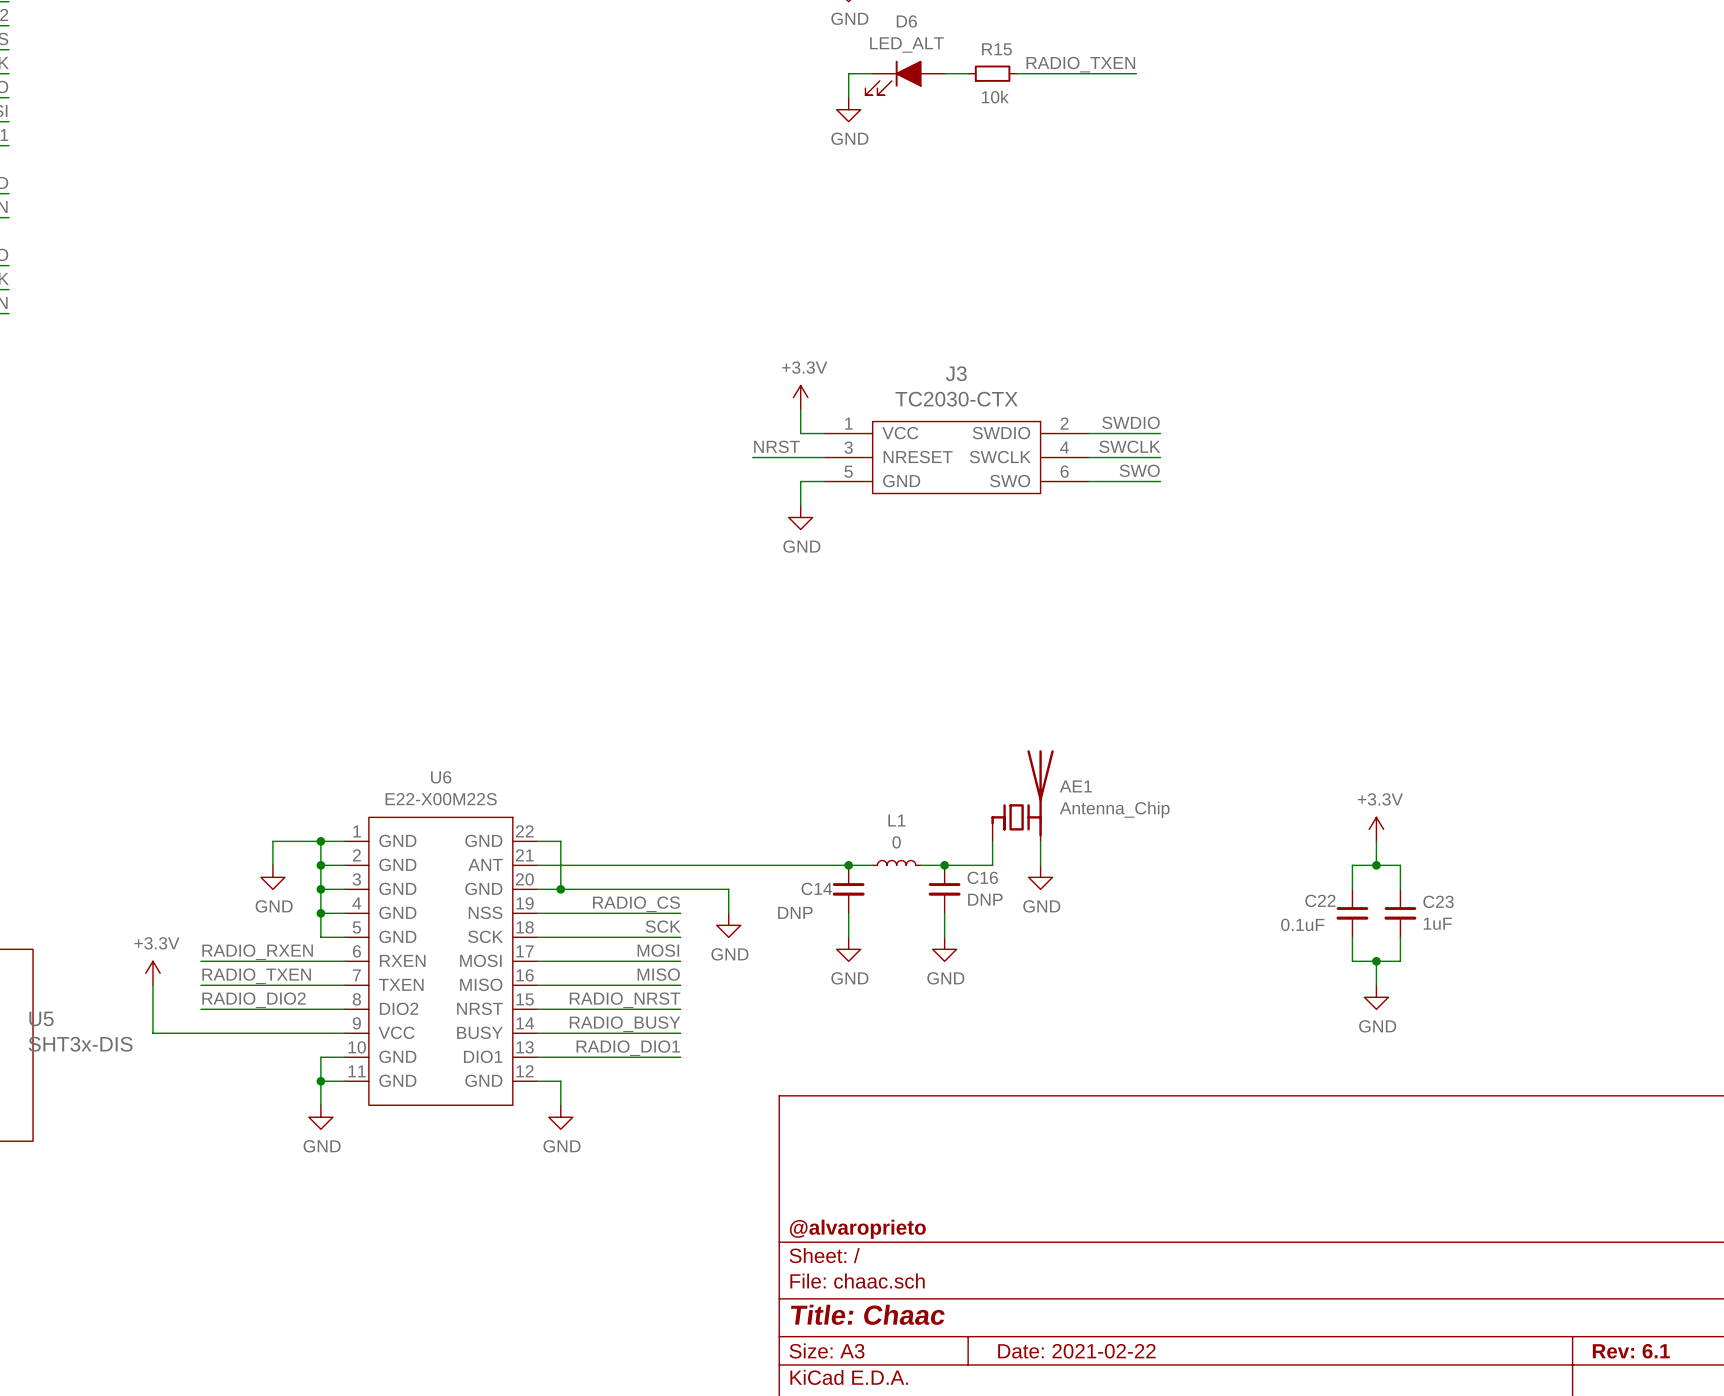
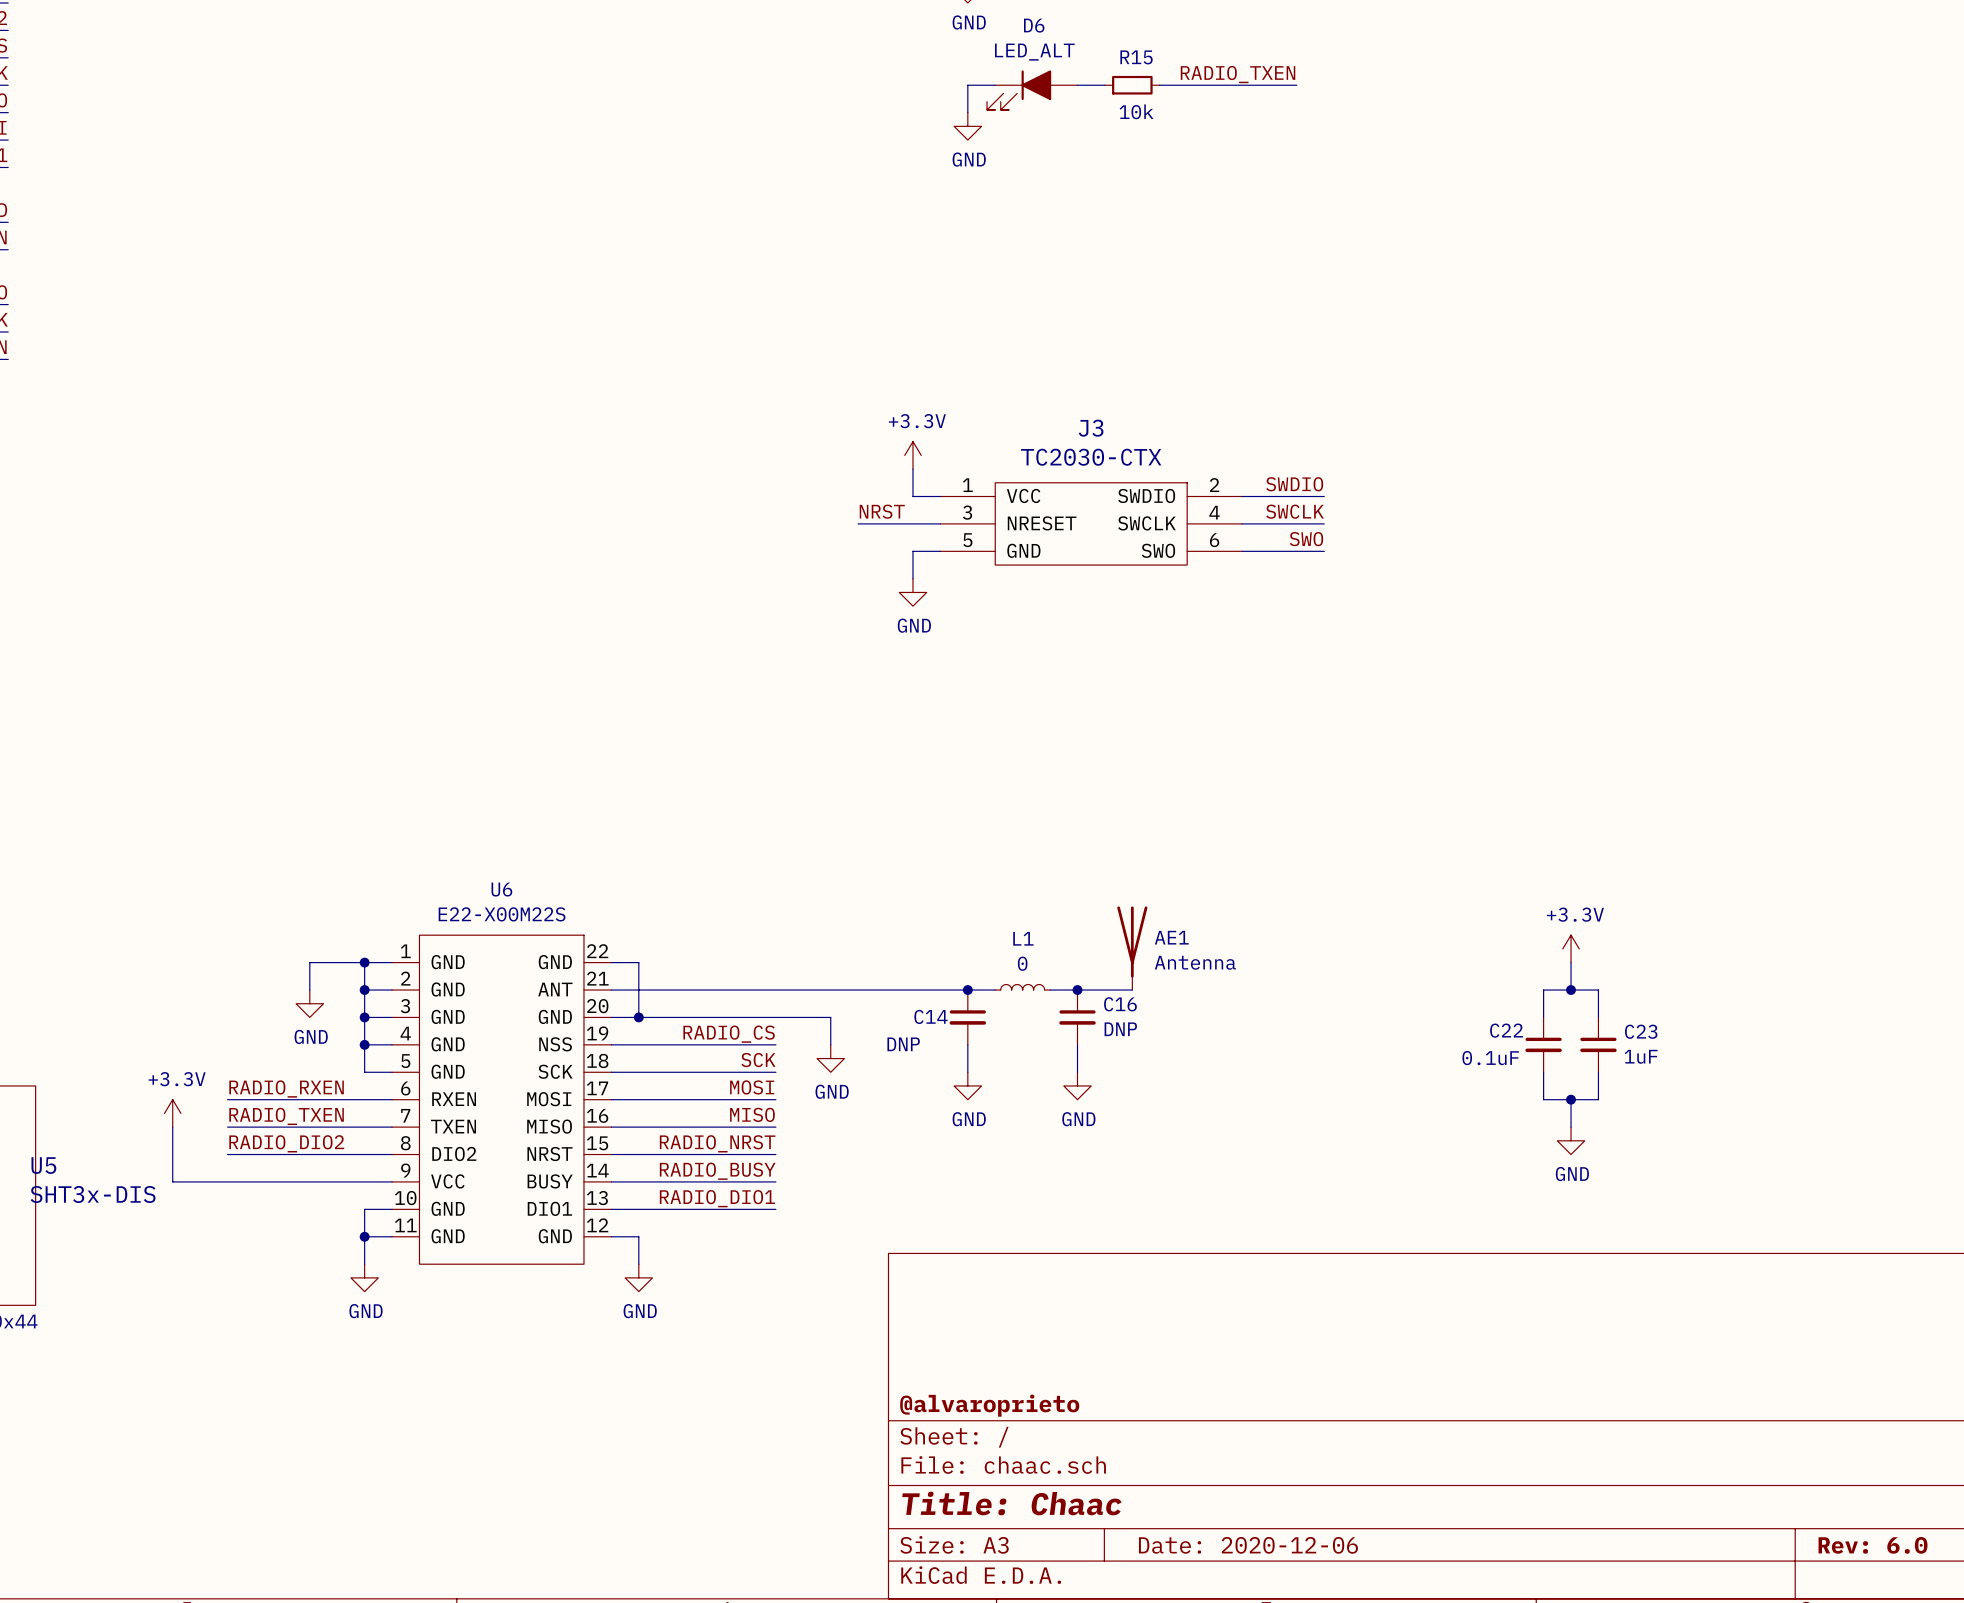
AE1 symbol: [991, 750, 1054, 842] -> [1117, 906, 1148, 991]
AE1 value: Antenna_Chip (1114, 809) -> Antenna (1195, 962)
wire: (1040, 841) (1040, 865) -> none
power symbol: GND (1040, 877) -> none
title block: Date: 2021-02-22 (1076, 1351) -> Date: 2020-12-06 (1248, 1545)
title block: Rev: 6.1 (1631, 1351) -> Rev: 6.0 (1873, 1545)

